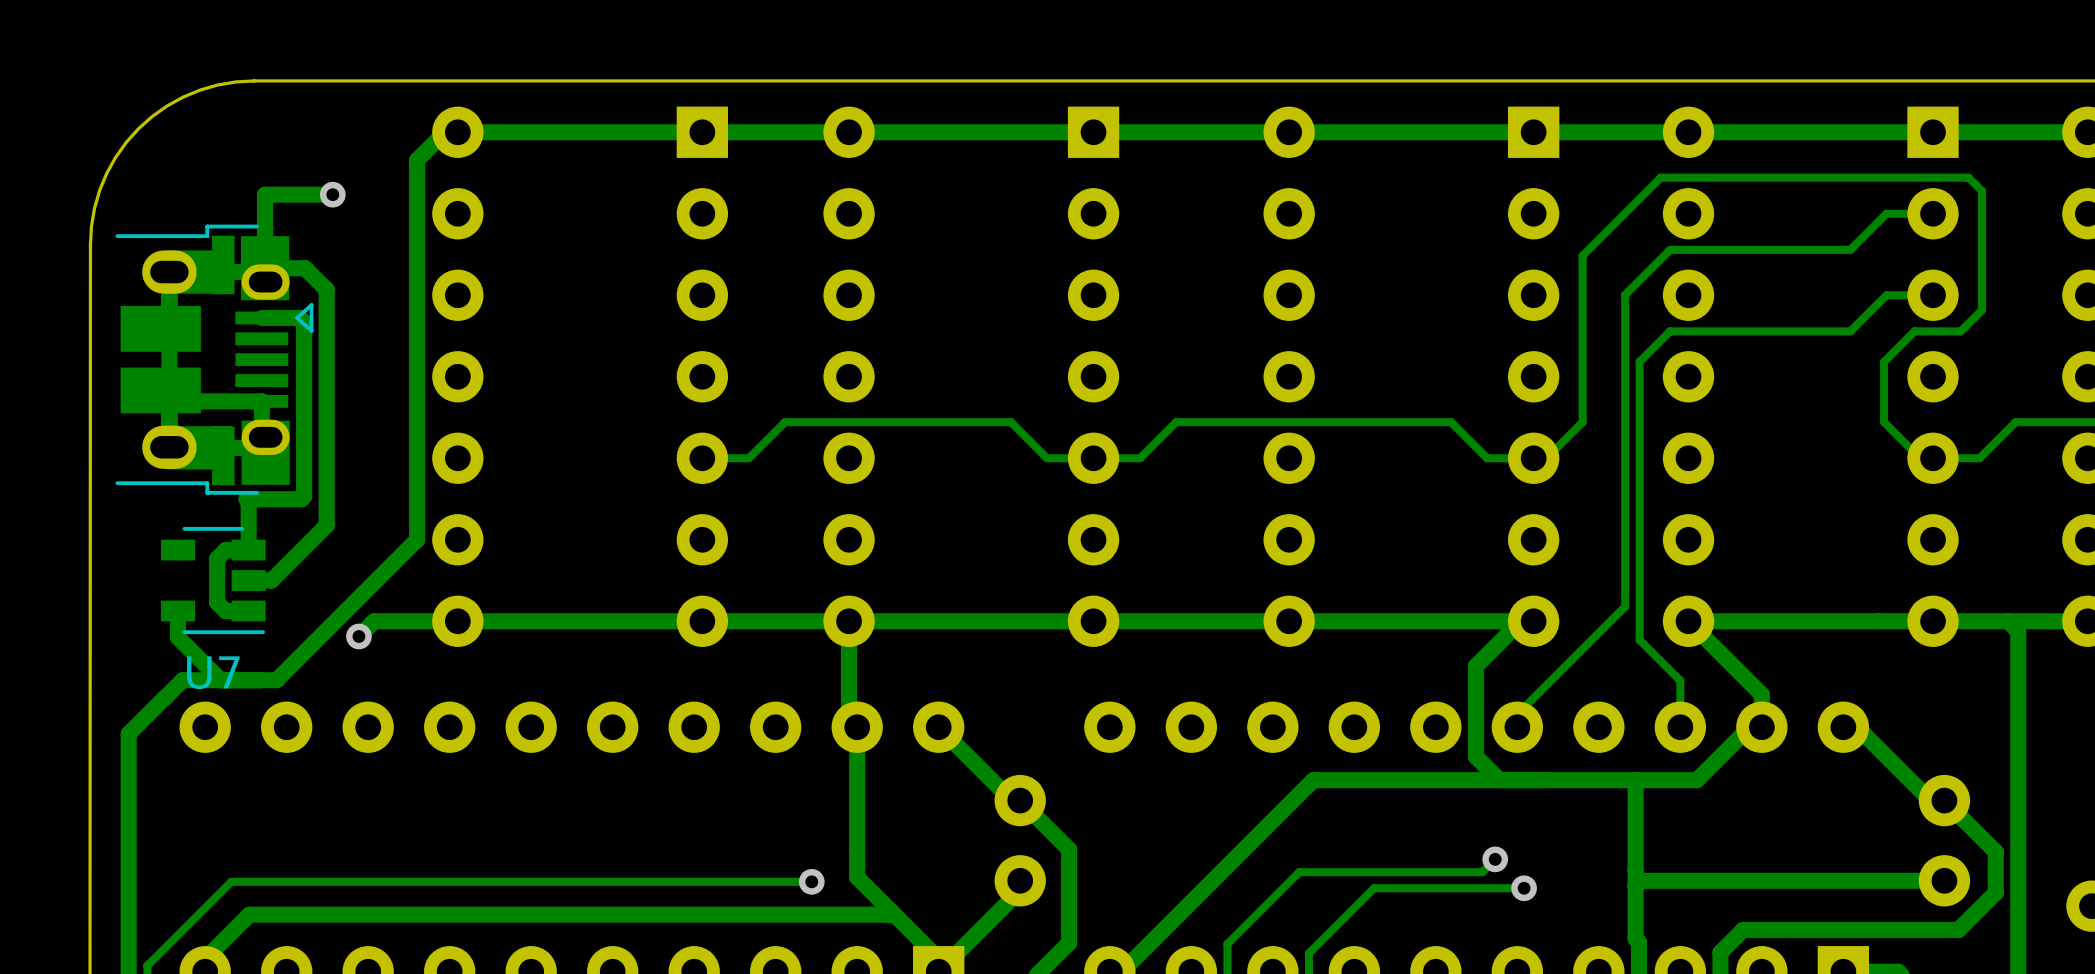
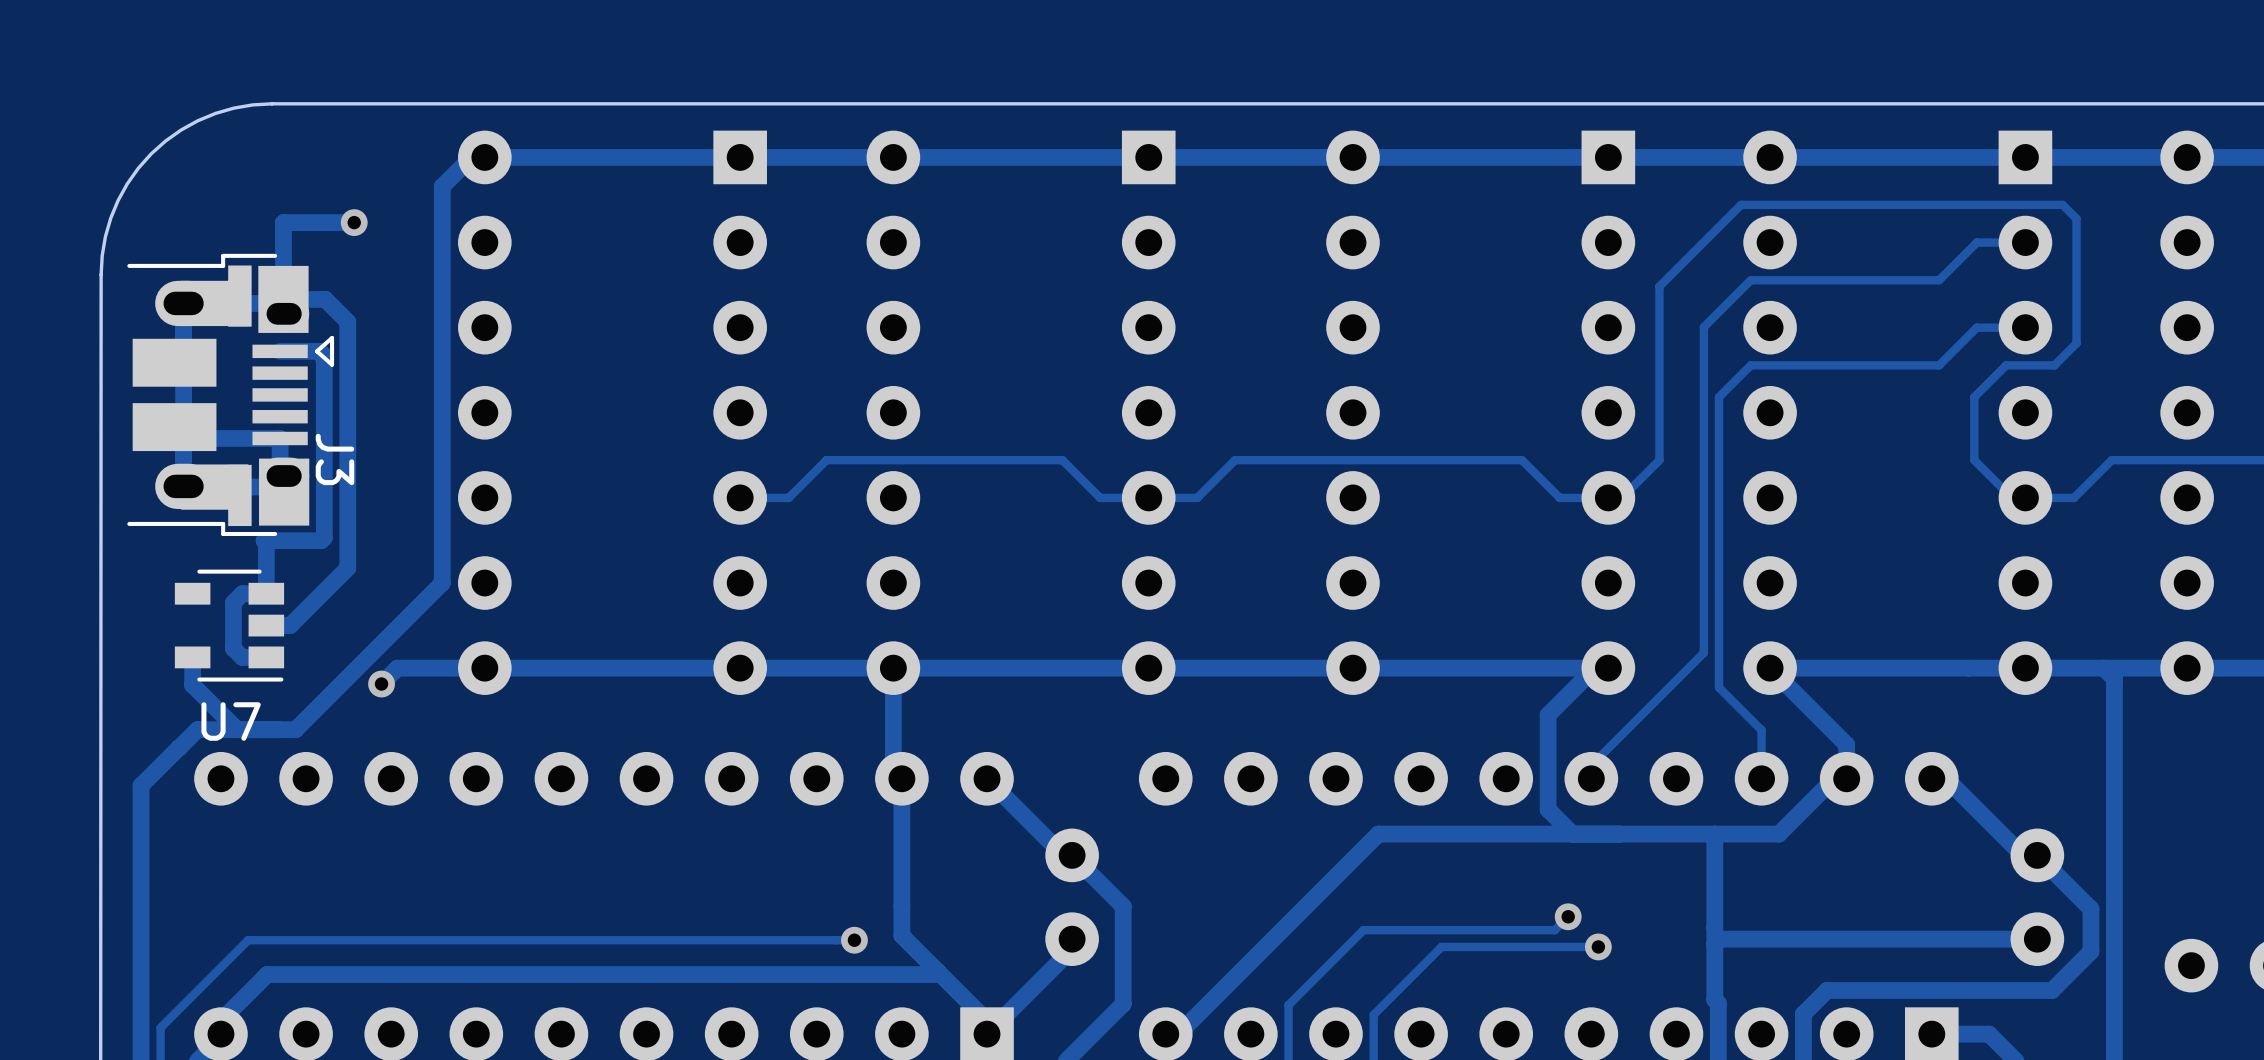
J3 name: none -> J3 (334, 459)

